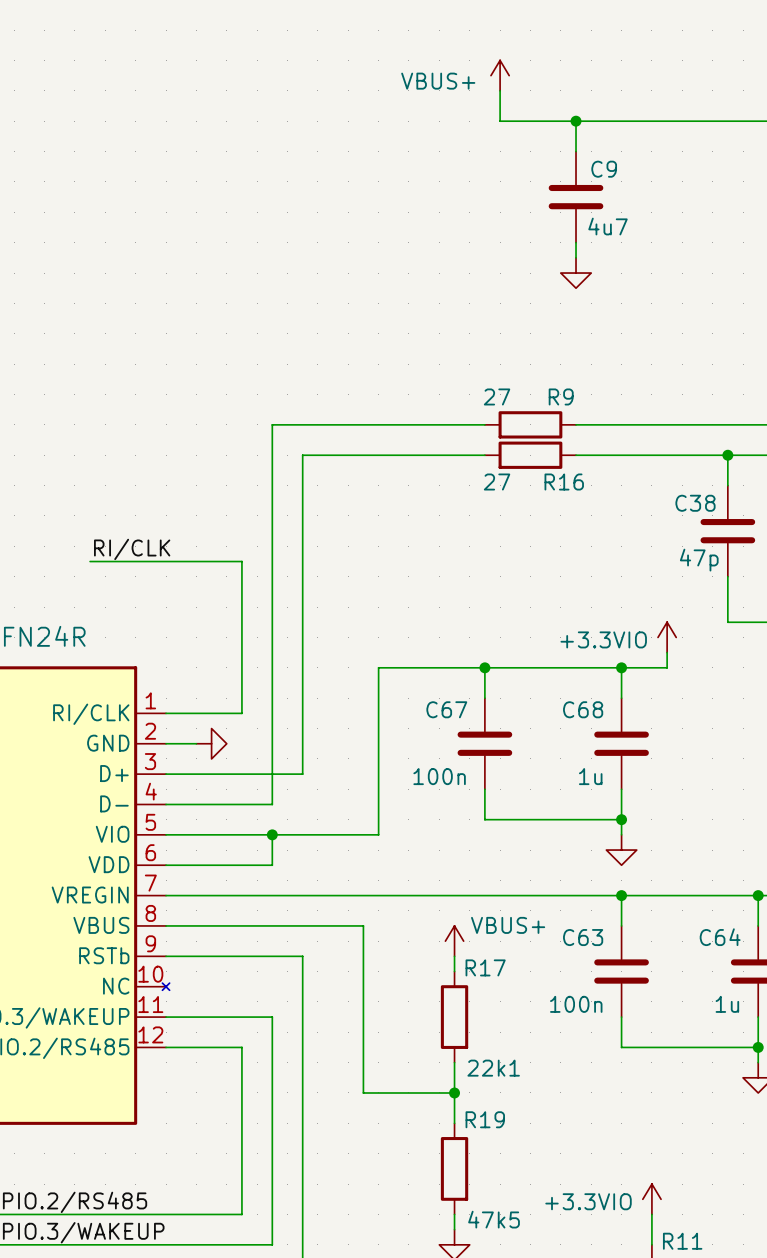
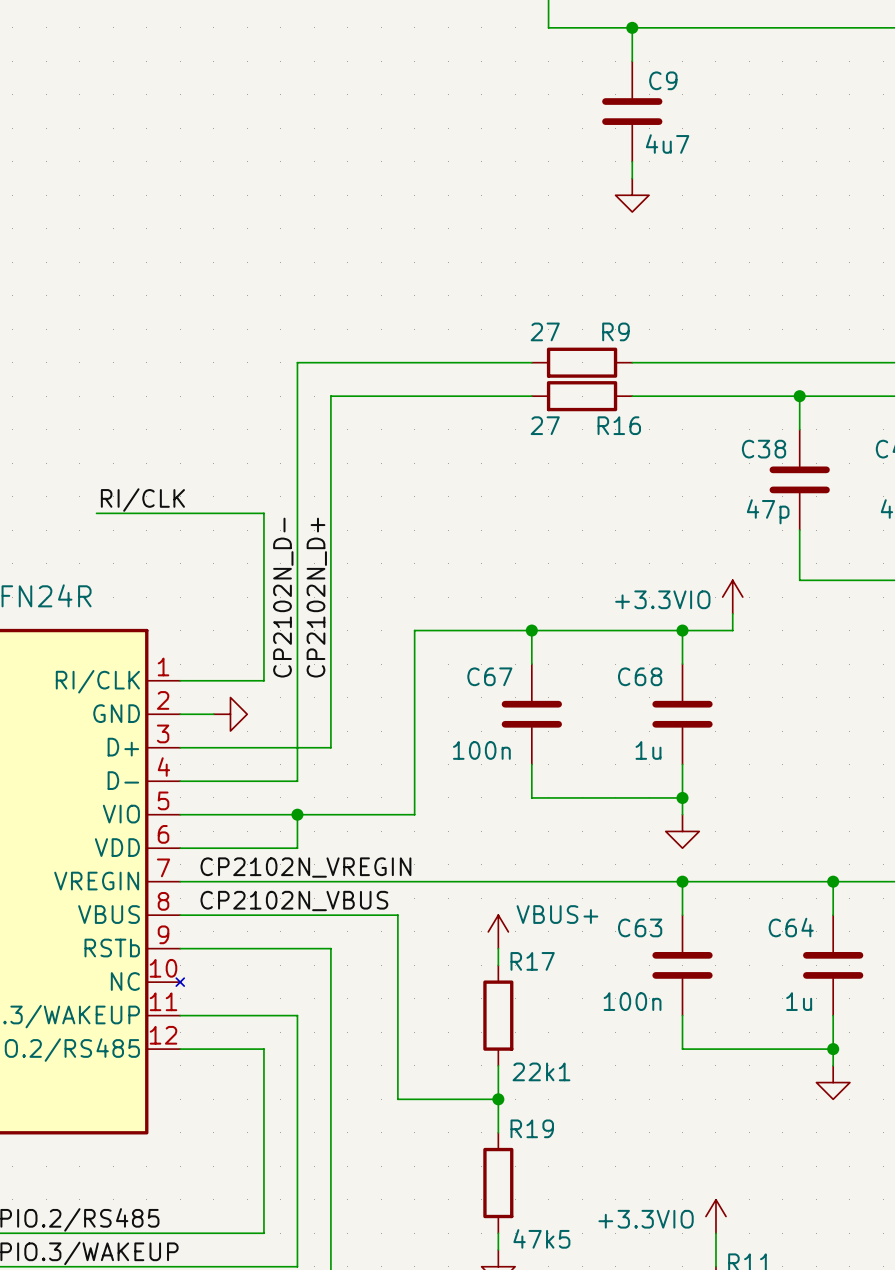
label: none -> CP2102N_D- (283, 597)
label: none -> CP2102N_D+ (316, 597)
label: none -> CP2102N_VREGIN (305, 867)
label: none -> CP2102N_VBUS (294, 901)

